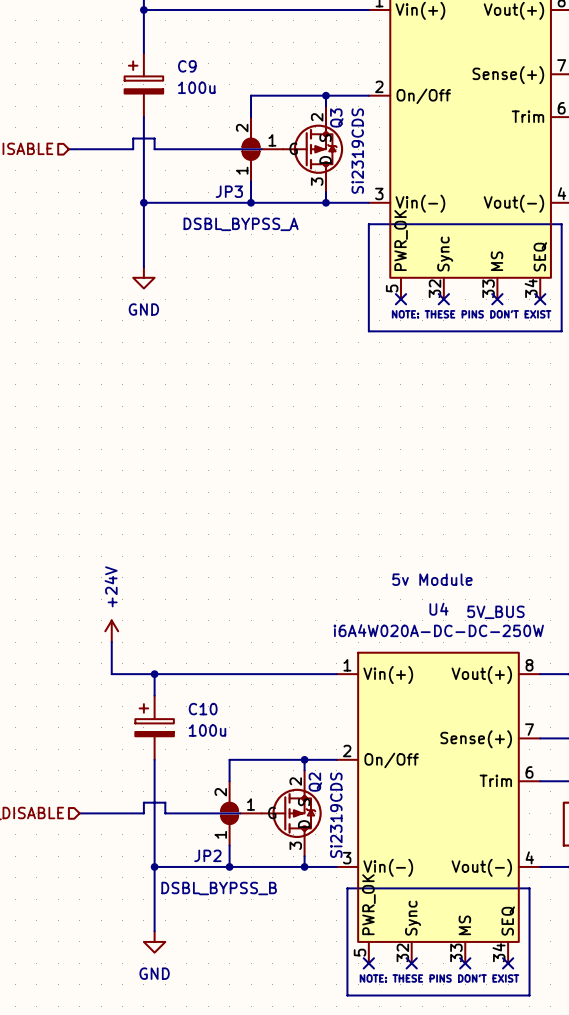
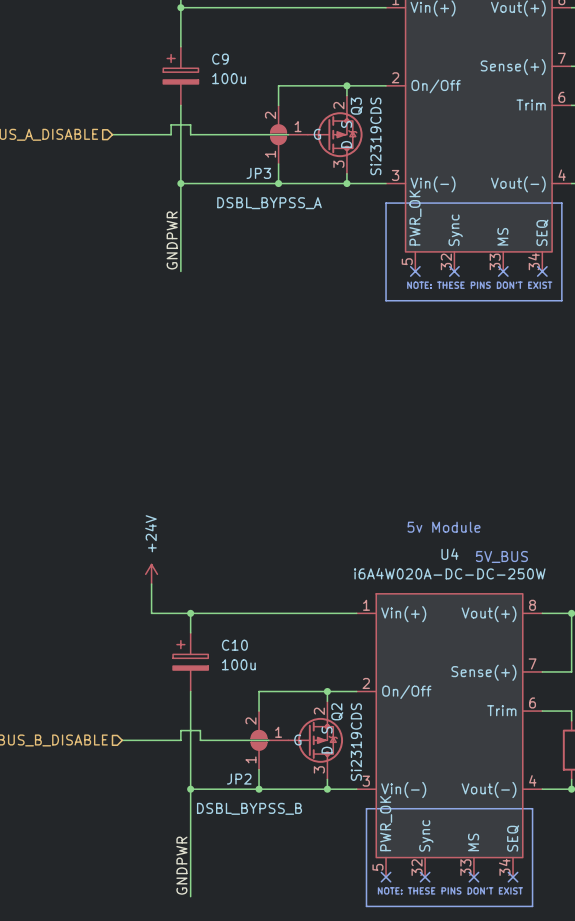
label: none -> GNDPWR (172, 240)
wire: none -> (180, 242) (180, 271)
power symbol: GND (143, 277) -> none
wire: none -> (190, 847) (190, 896)
power symbol: GND (154, 941) -> none
label: none -> GNDPWR (181, 865)

